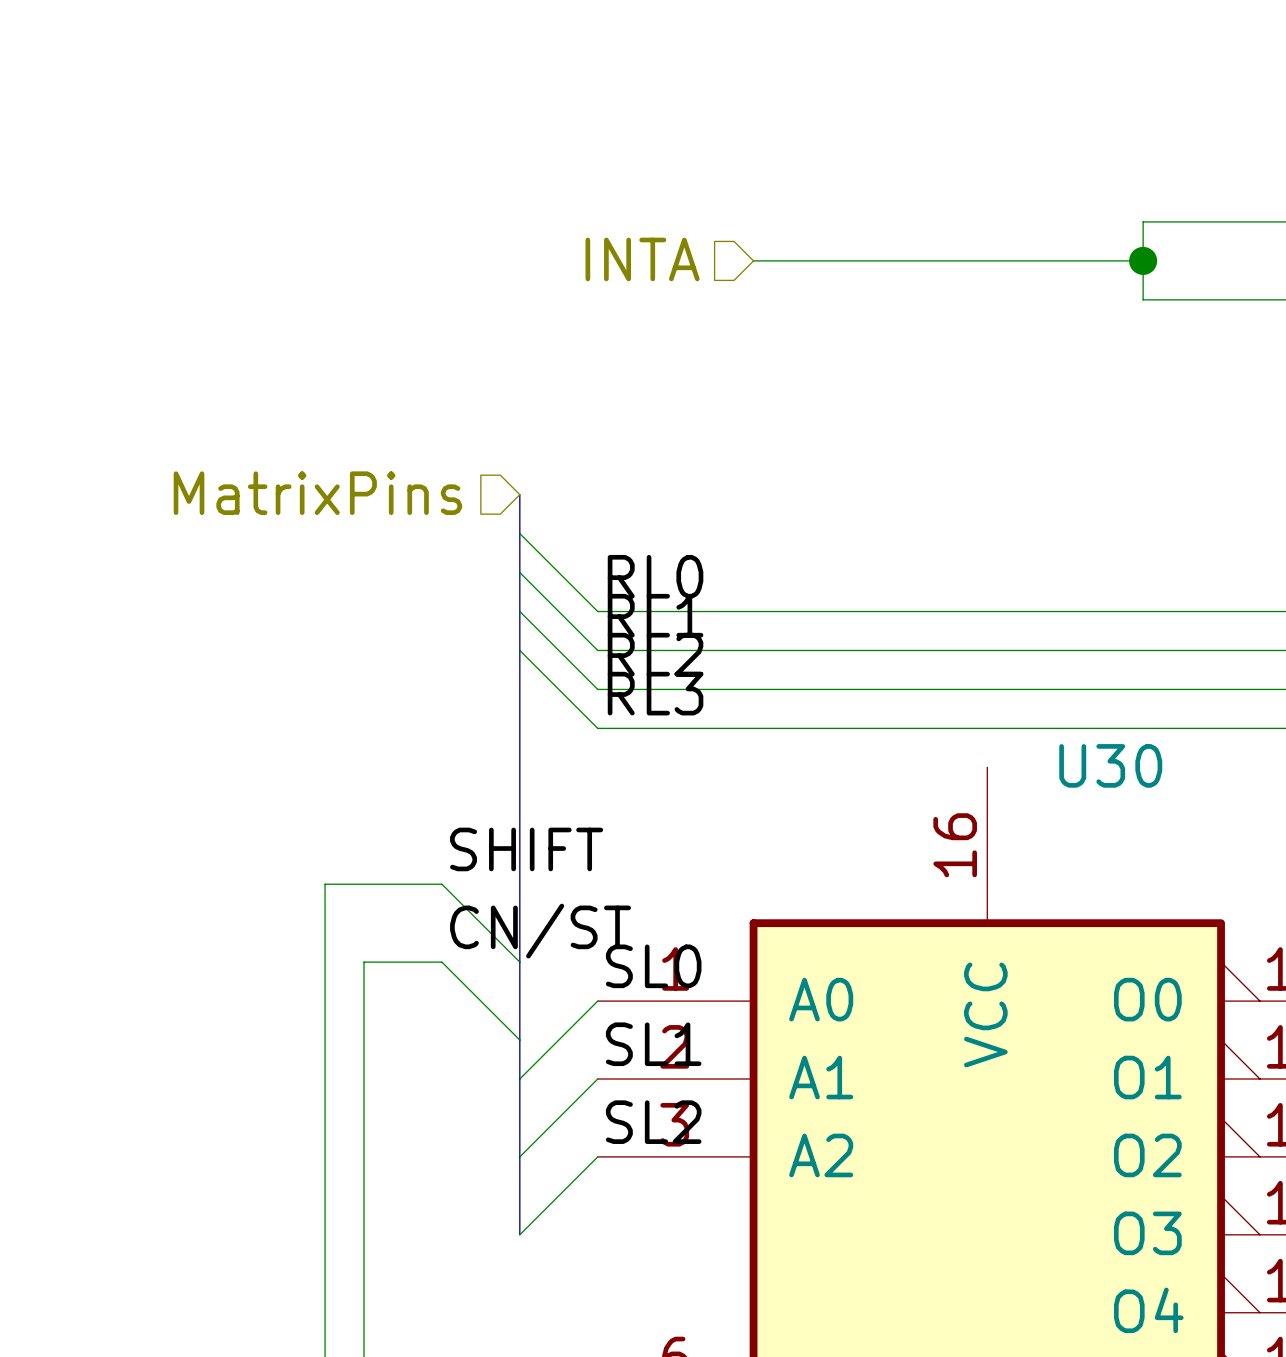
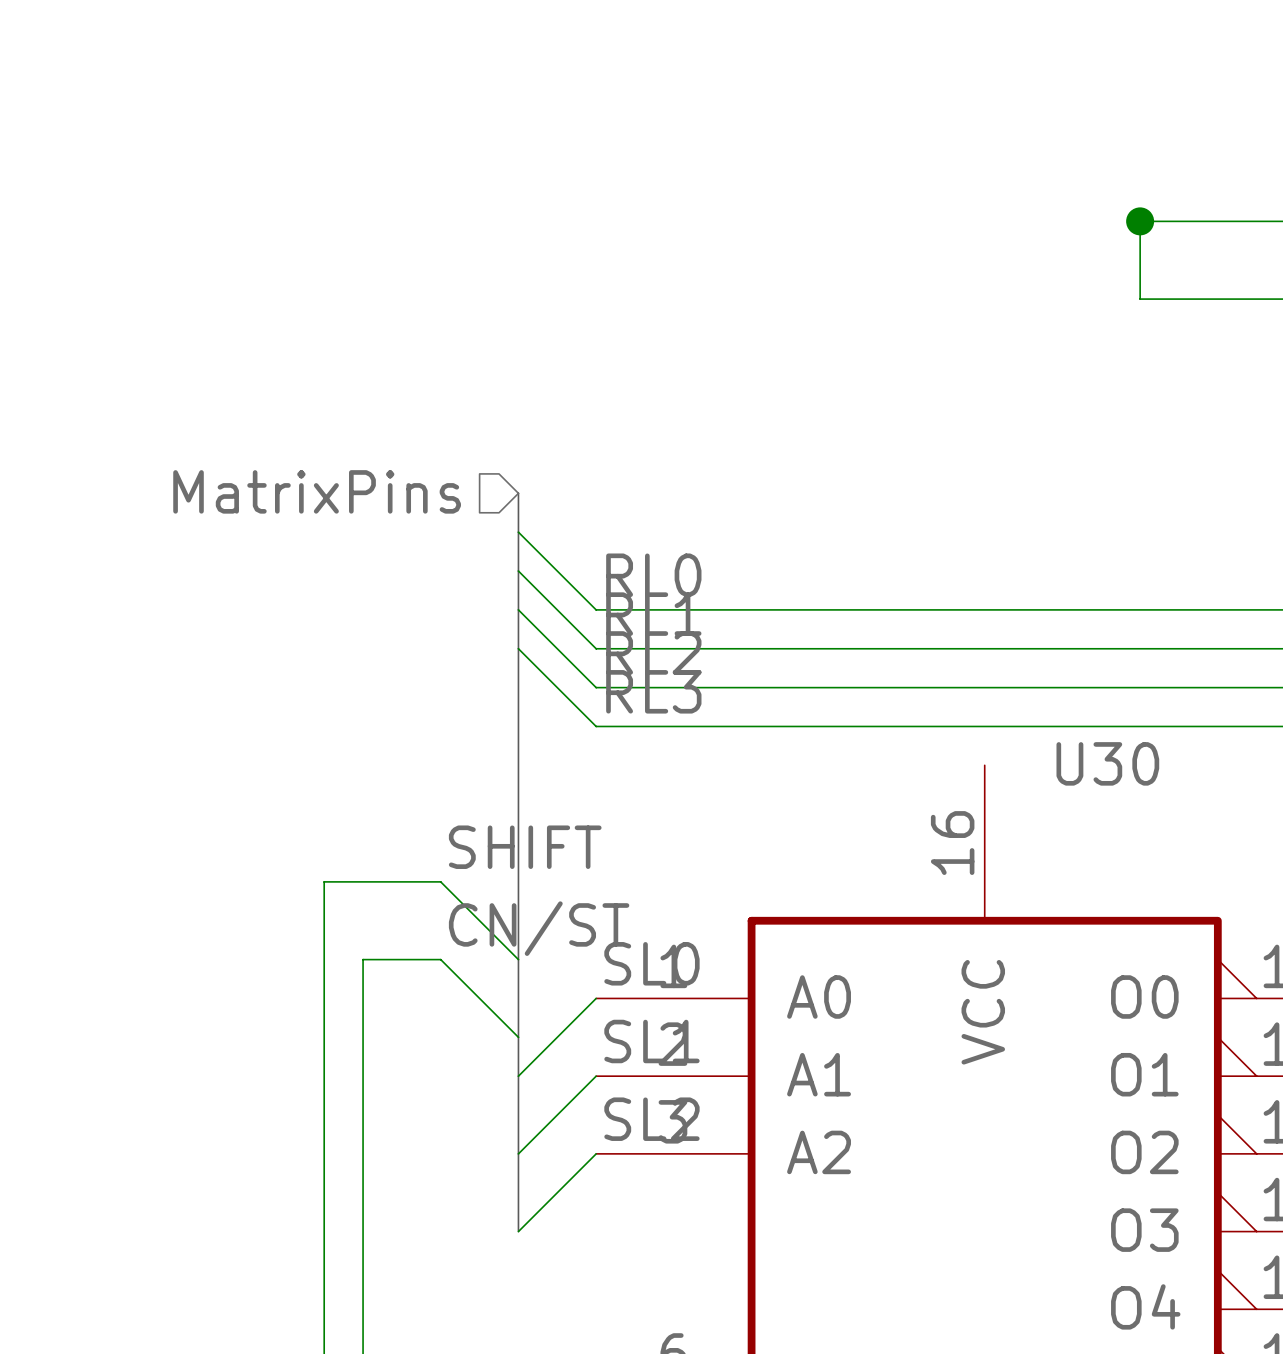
hierarchical label: INTA (642, 259) -> none
wire: (753, 260) (1143, 260) -> none
junction position: (1143, 260) -> (1140, 221)

